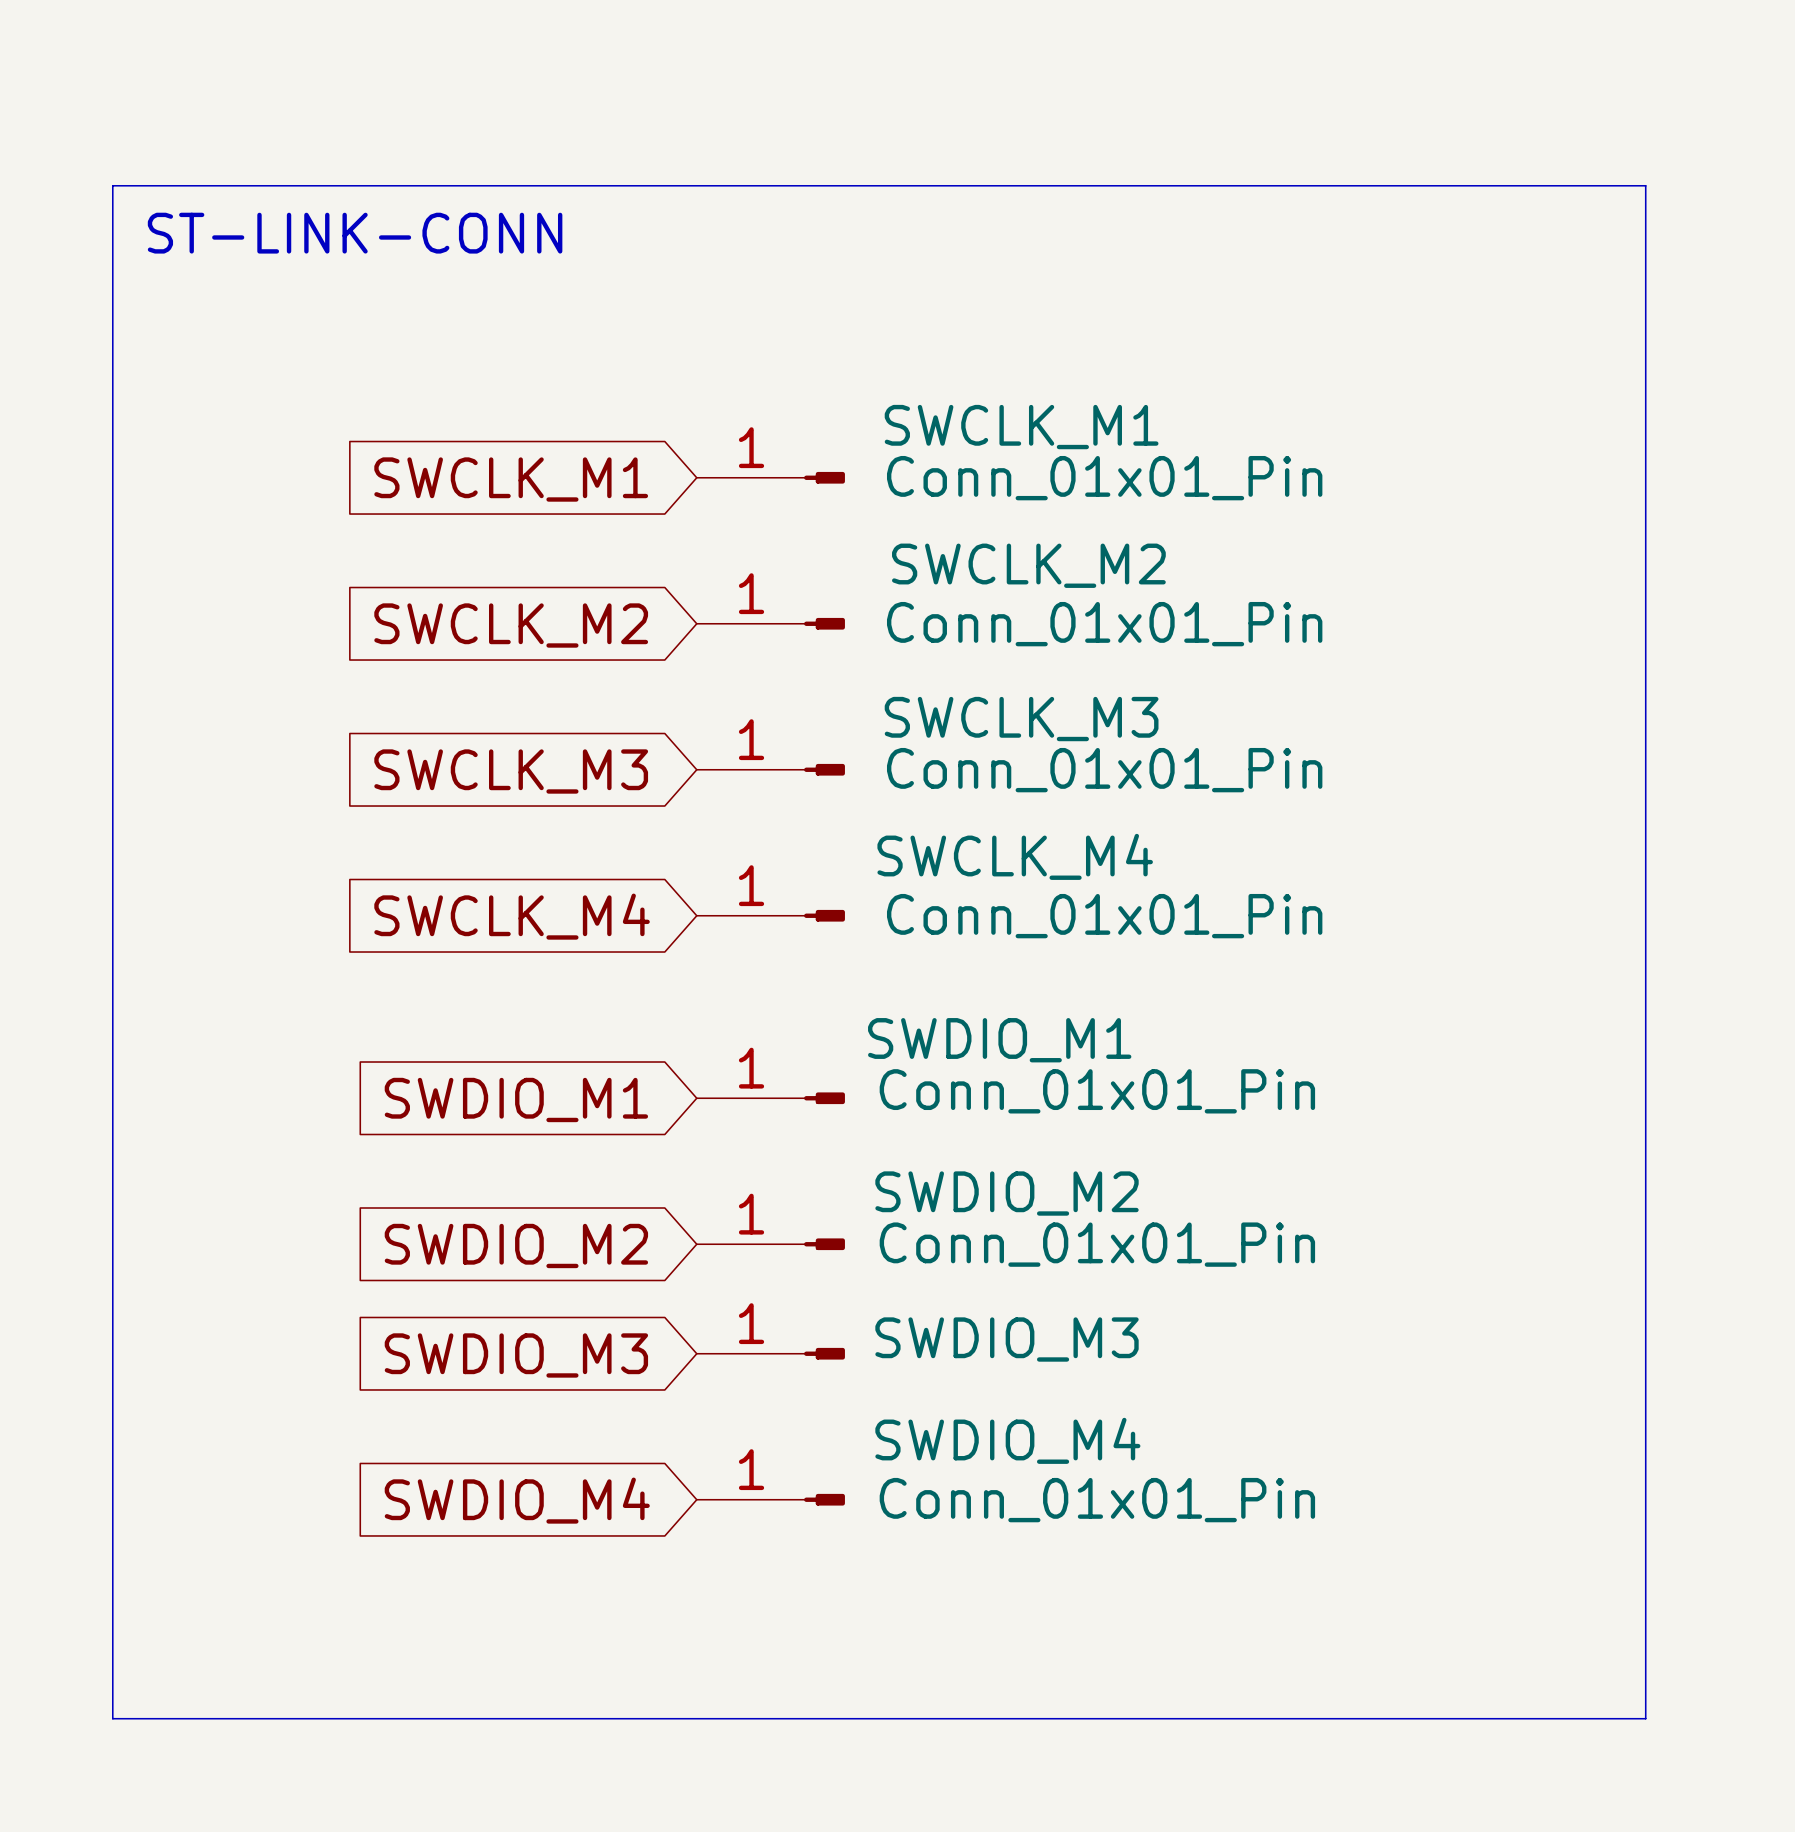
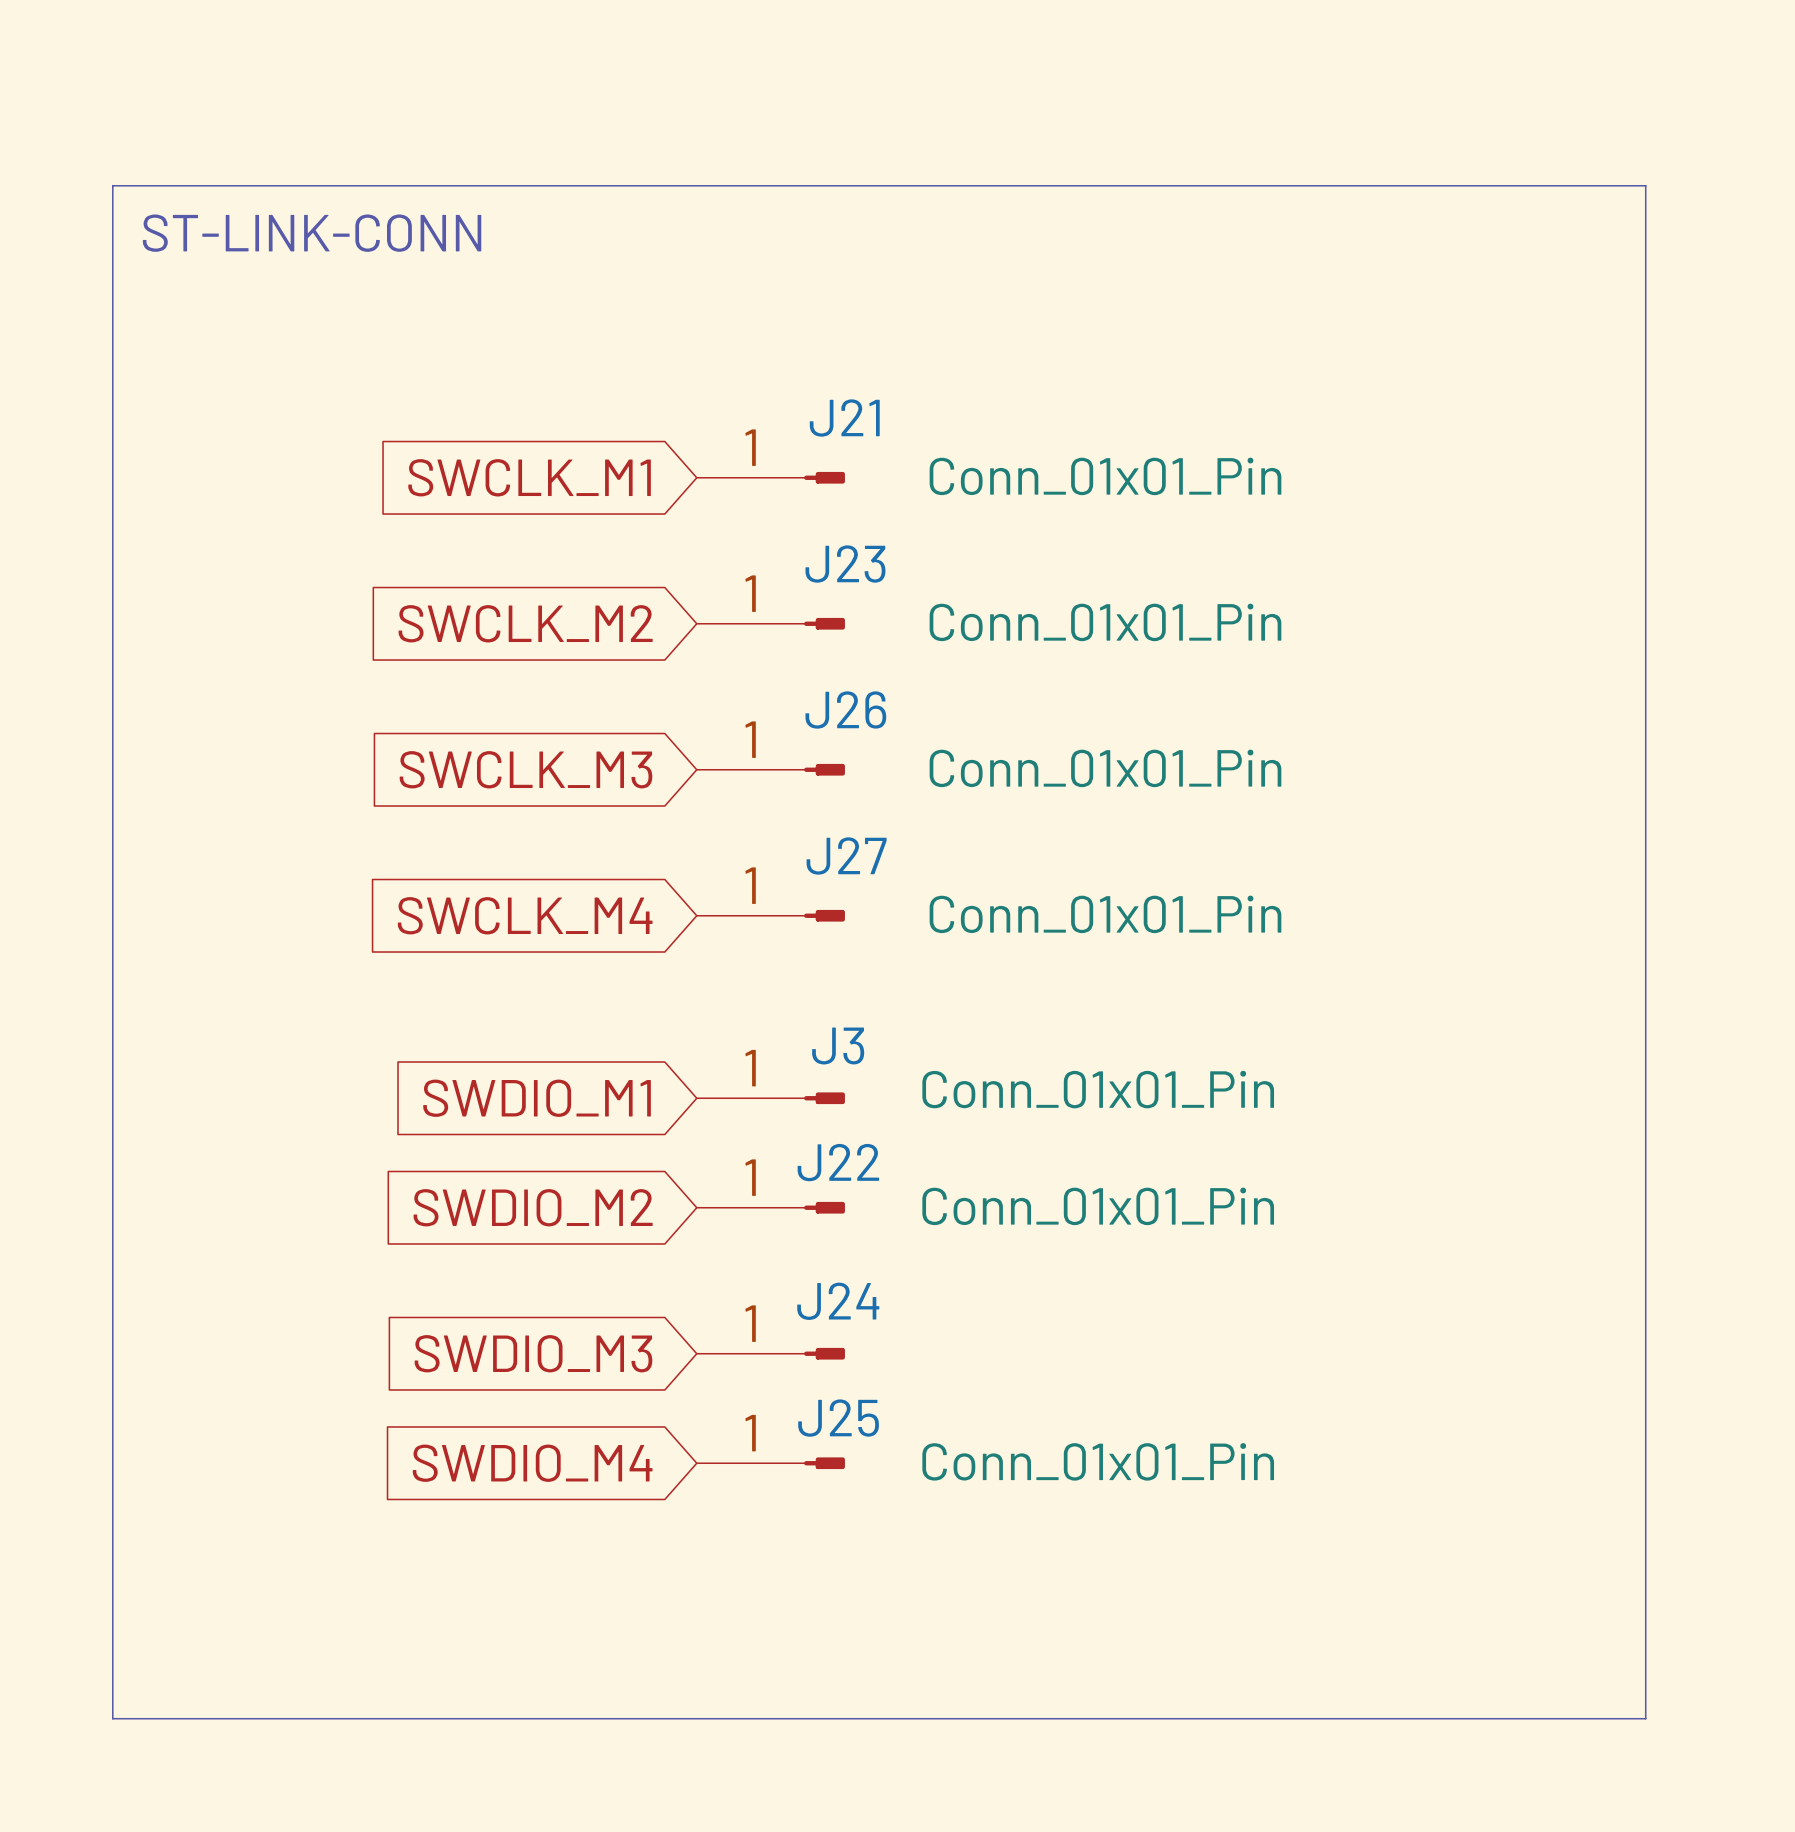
SWCLK_M1 name: SWCLK_M1 (1021, 427) -> J21 (844, 418)
SWCLK_M2 name: SWCLK_M2 (1028, 565) -> J23 (845, 564)
SWCLK_M3 name: SWCLK_M3 (1021, 719) -> J26 (845, 710)
SWCLK_M4 name: SWCLK_M4 (1015, 856) -> J27 (846, 855)
SWDIO_M1 name: SWDIO_M1 (999, 1040) -> J3 (838, 1045)
J22: none -> Conn_01x01_Pin (770, 1207)
SWDIO_M2: Conn_01x01_Pin (770, 1244) -> none
global label position: SWDIO_M2 (516, 1245) -> SWDIO_M2 (533, 1207)
SWDIO_M3 name: SWDIO_M3 (1007, 1339) -> J24 (838, 1301)
J25: none -> Conn_01x01_Pin (770, 1463)
SWDIO_M4: Conn_01x01_Pin (770, 1499) -> none
global label position: SWDIO_M4 (517, 1500) -> SWDIO_M4 (532, 1463)

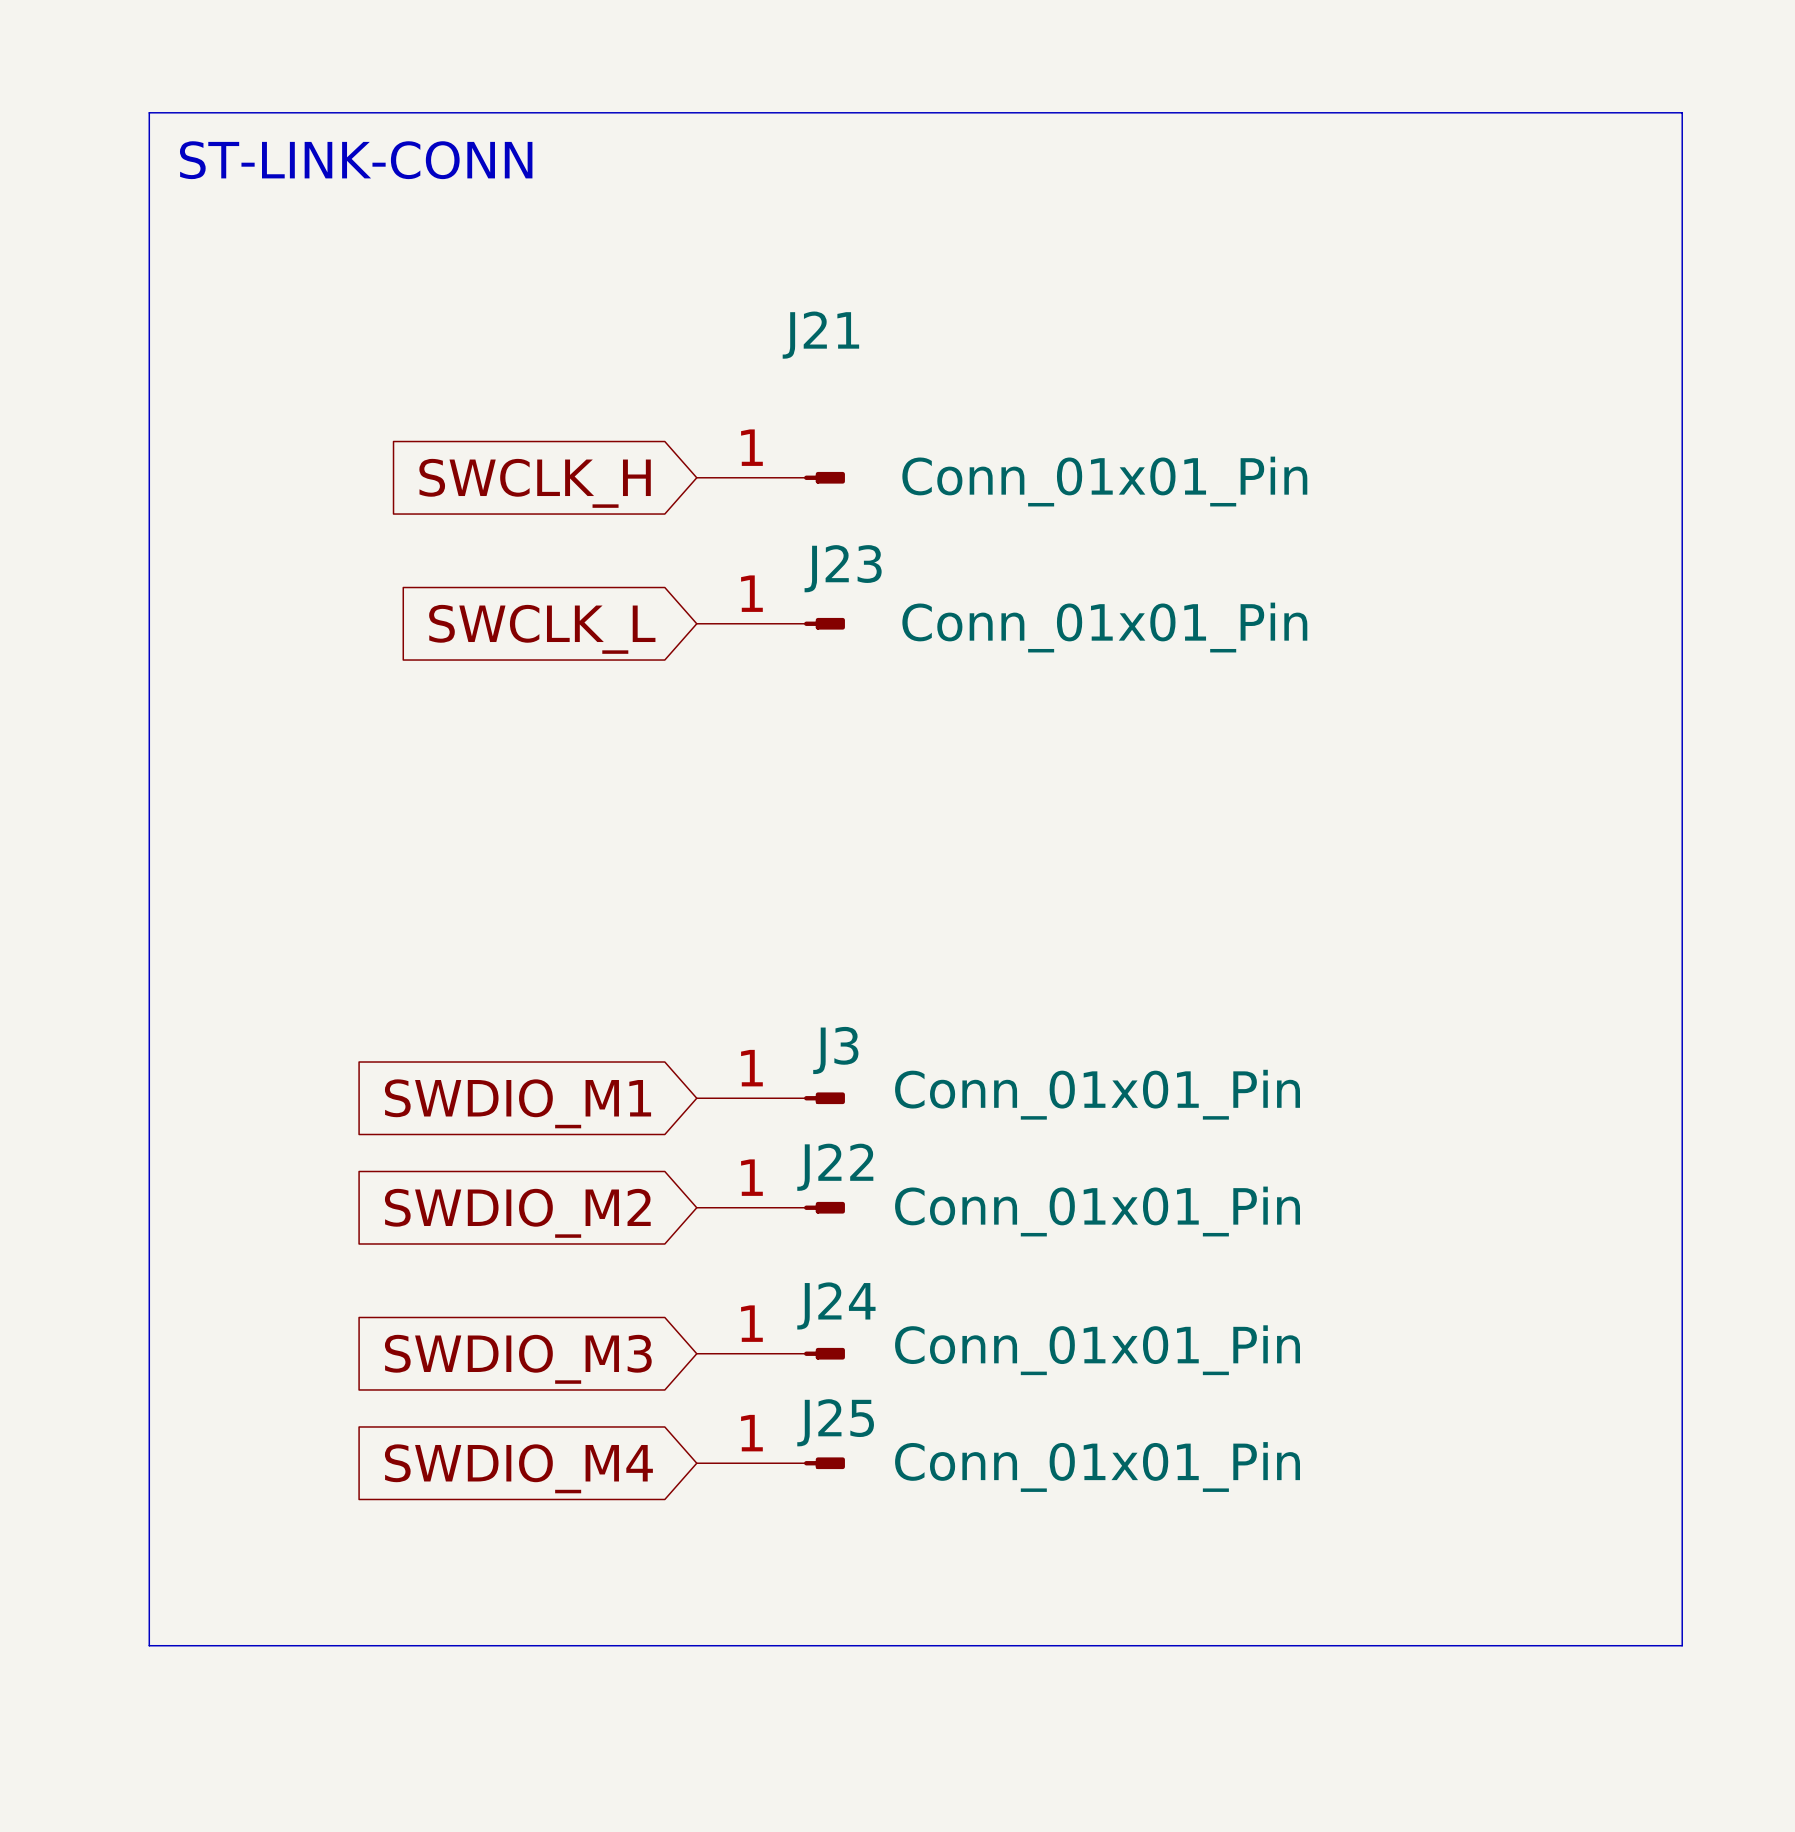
line: (112, 185) (1645, 185) (1645, 1718) (112, 1718) (112, 185) -> (149, 112) (149, 1645) (1682, 1645) (1682, 112) (149, 112)
text position: ST-LINK-CONN (312, 233) -> ST-LINK-CONN (356, 160)
J21 name position: J21 (844, 418) -> J21 (820, 335)
global label: SWCLK_M1 (529, 477) -> SWCLK_H (535, 483)
global label: SWCLK_M2 (525, 623) -> SWCLK_L (542, 629)
global label: SWCLK_M3 (526, 769) -> none
J26: Conn_01x01_Pin (770, 769) -> none
global label: SWCLK_M4 (525, 915) -> none
J27: Conn_01x01_Pin (770, 915) -> none
J24 value: none -> Conn_01x01_Pin (1097, 1350)

